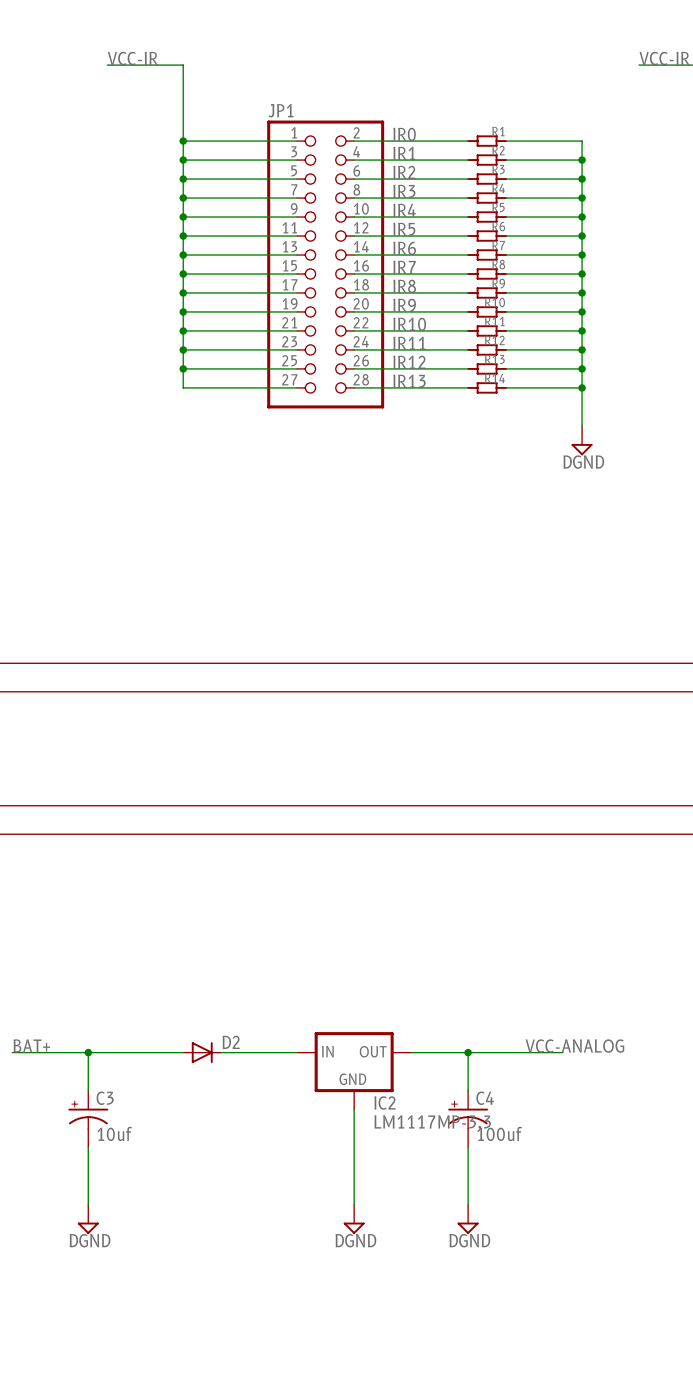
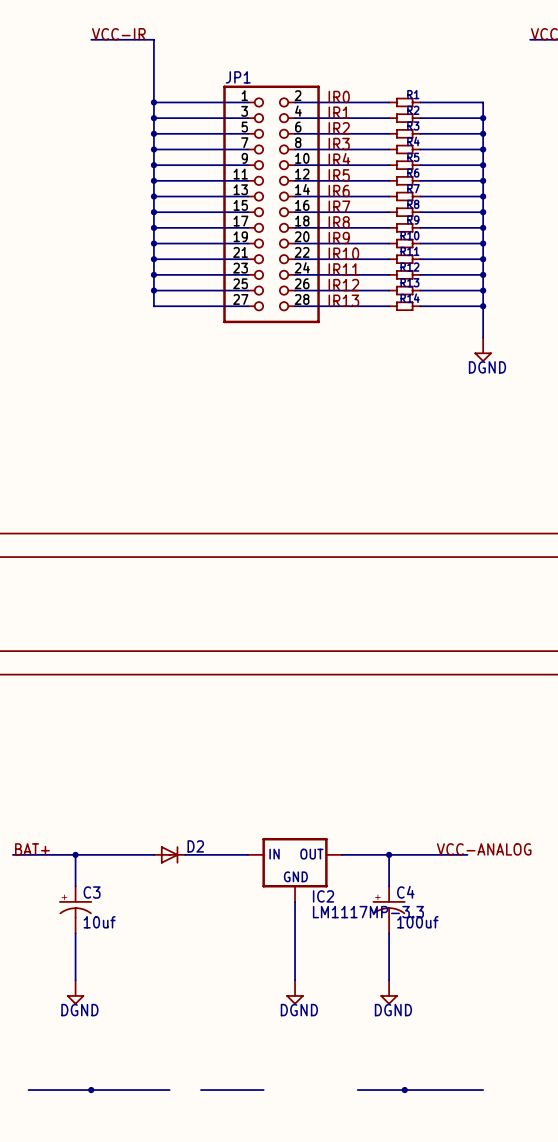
wire: none -> (28, 1090) (169, 1090)
junction: none -> (91, 1090)
wire: none -> (200, 1090) (263, 1090)
wire: none -> (357, 1090) (483, 1090)
junction: none -> (404, 1090)

